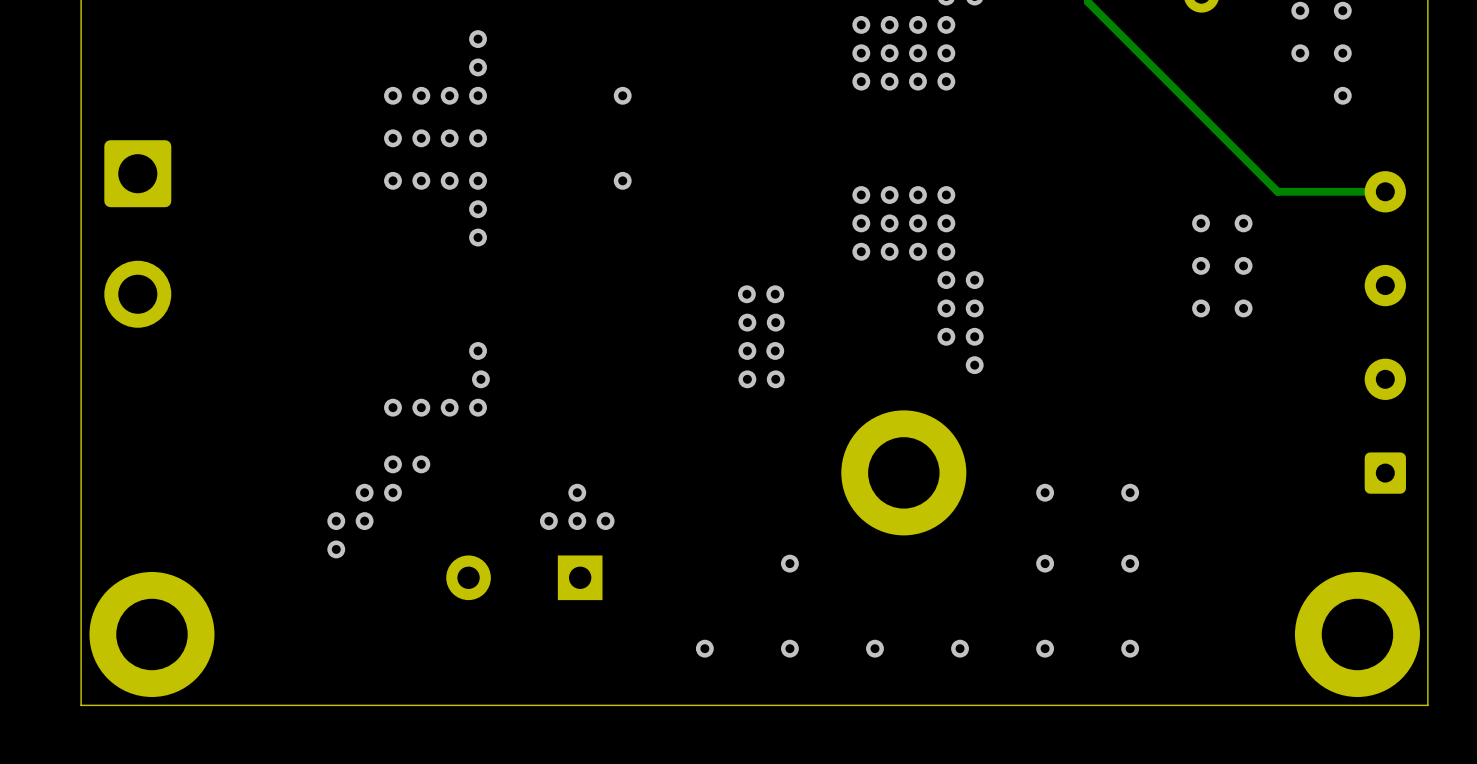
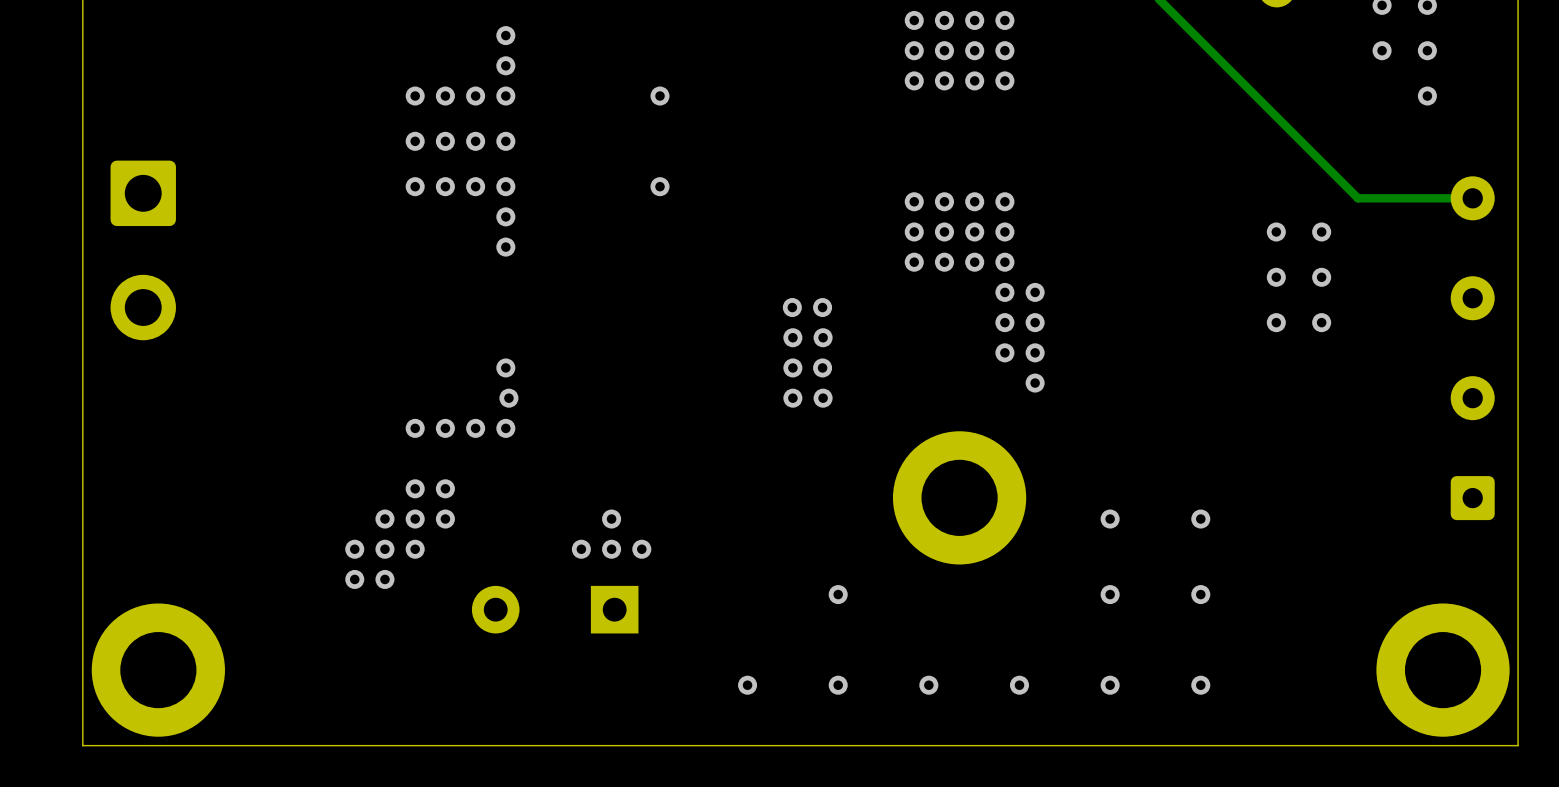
part footprint: [104, 140, 172, 328] -> [110, 160, 176, 341]
via: none -> (445, 519)
via: none -> (415, 549)
via: none -> (384, 579)

